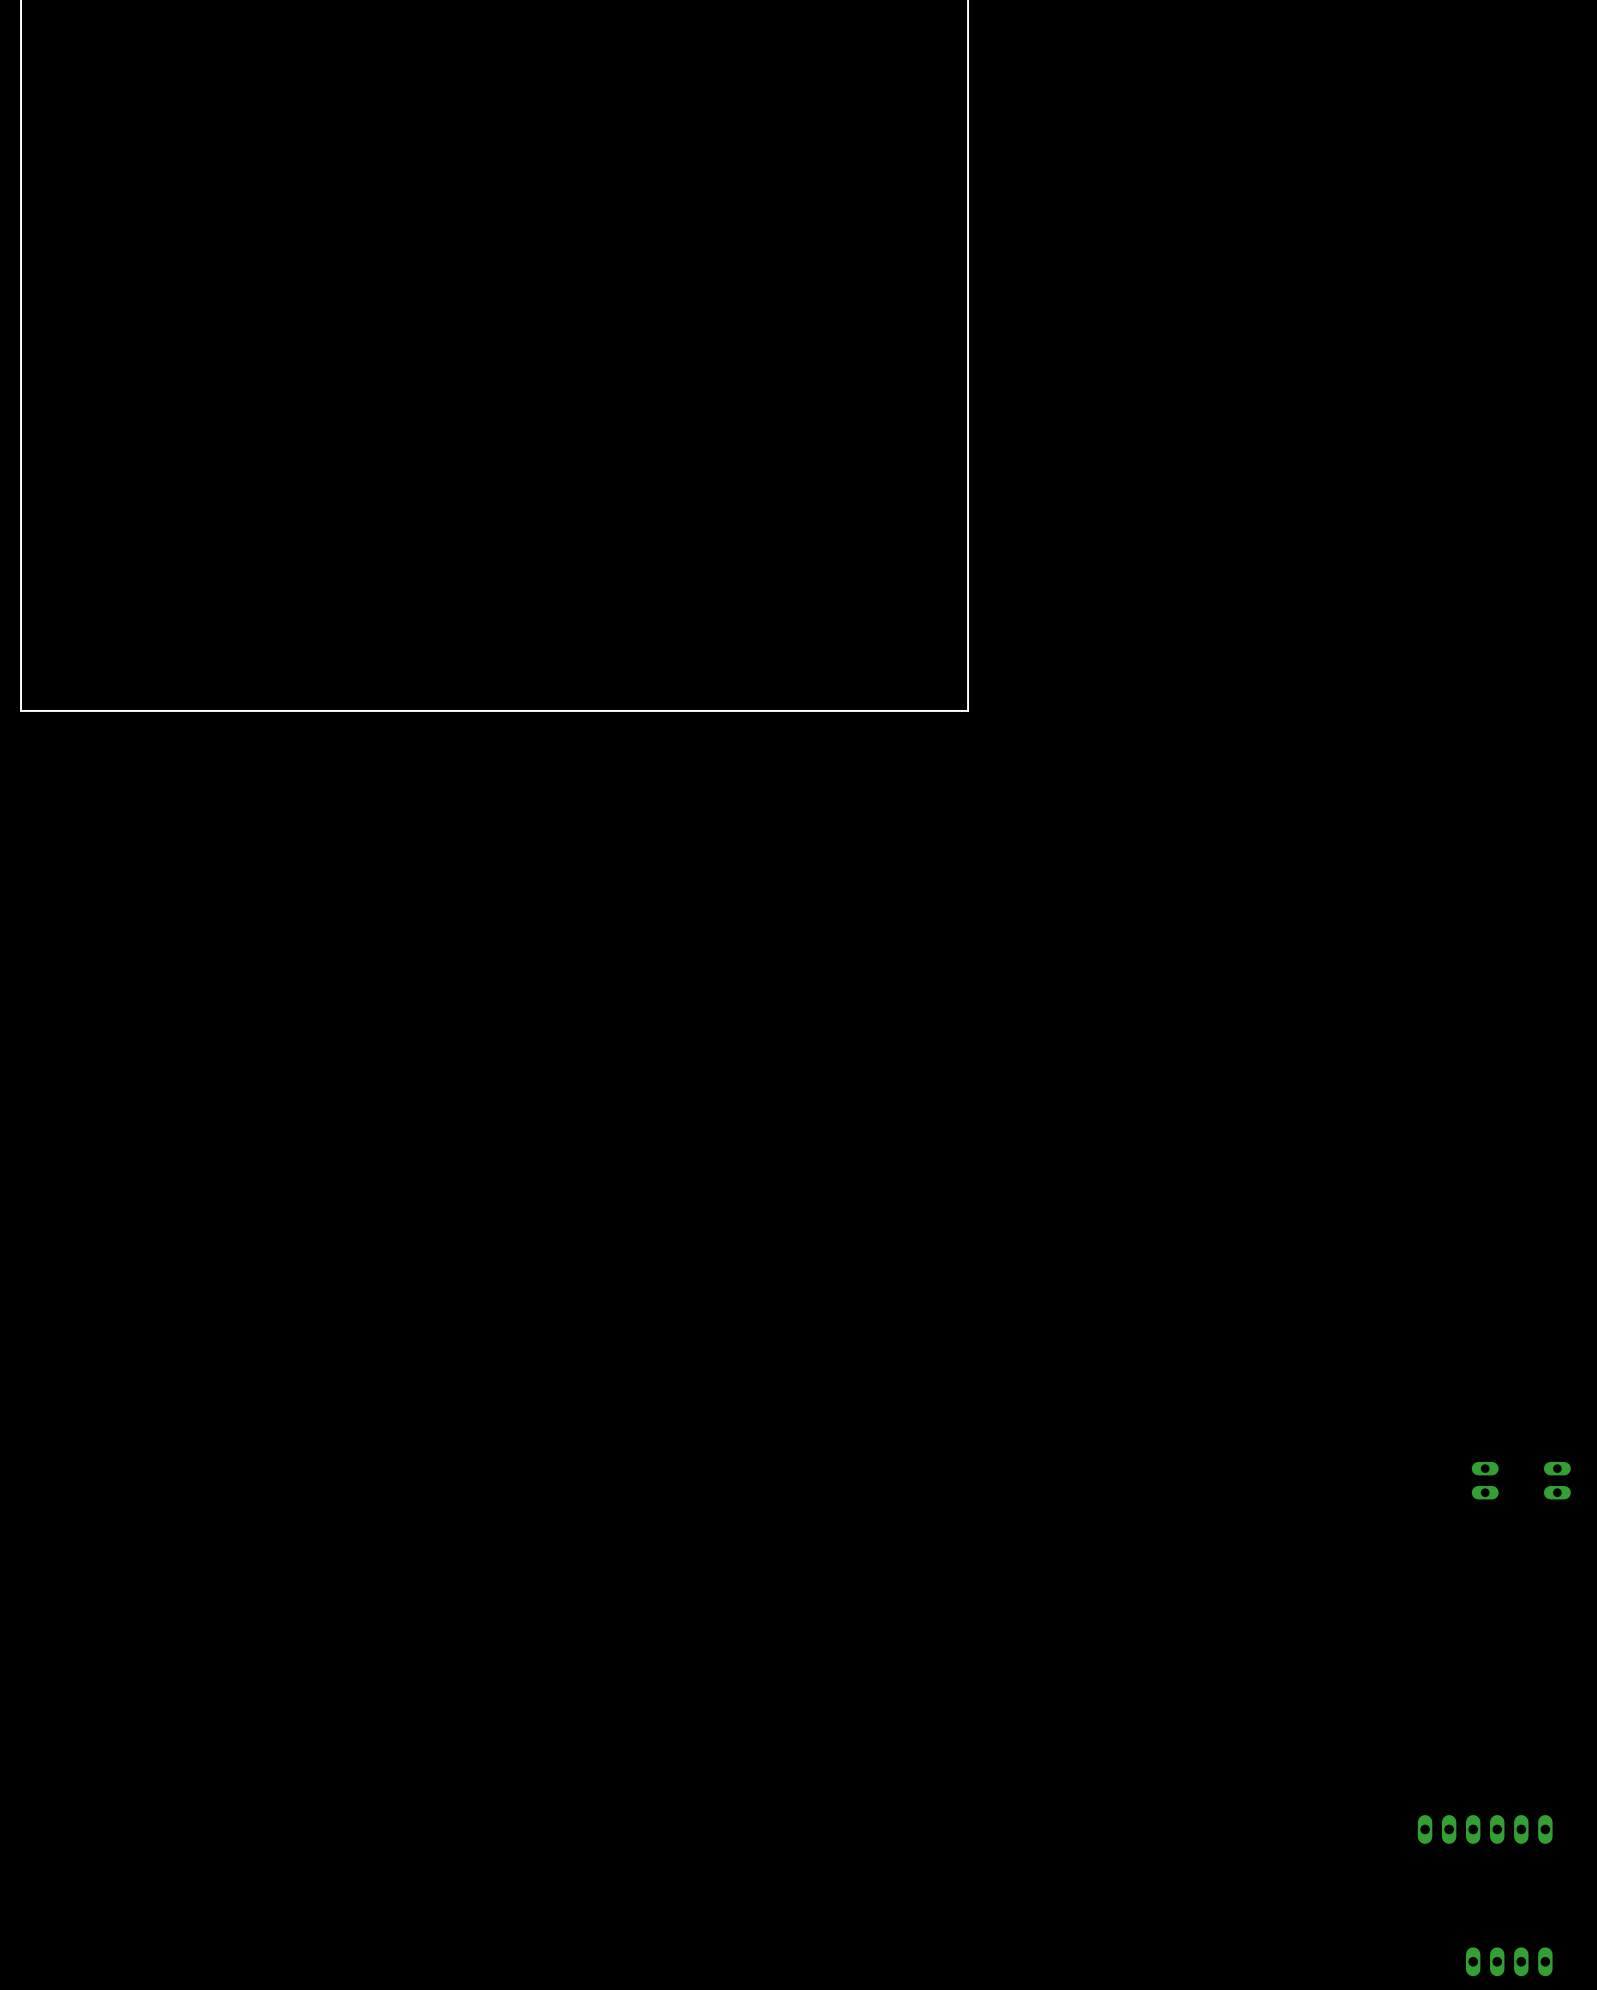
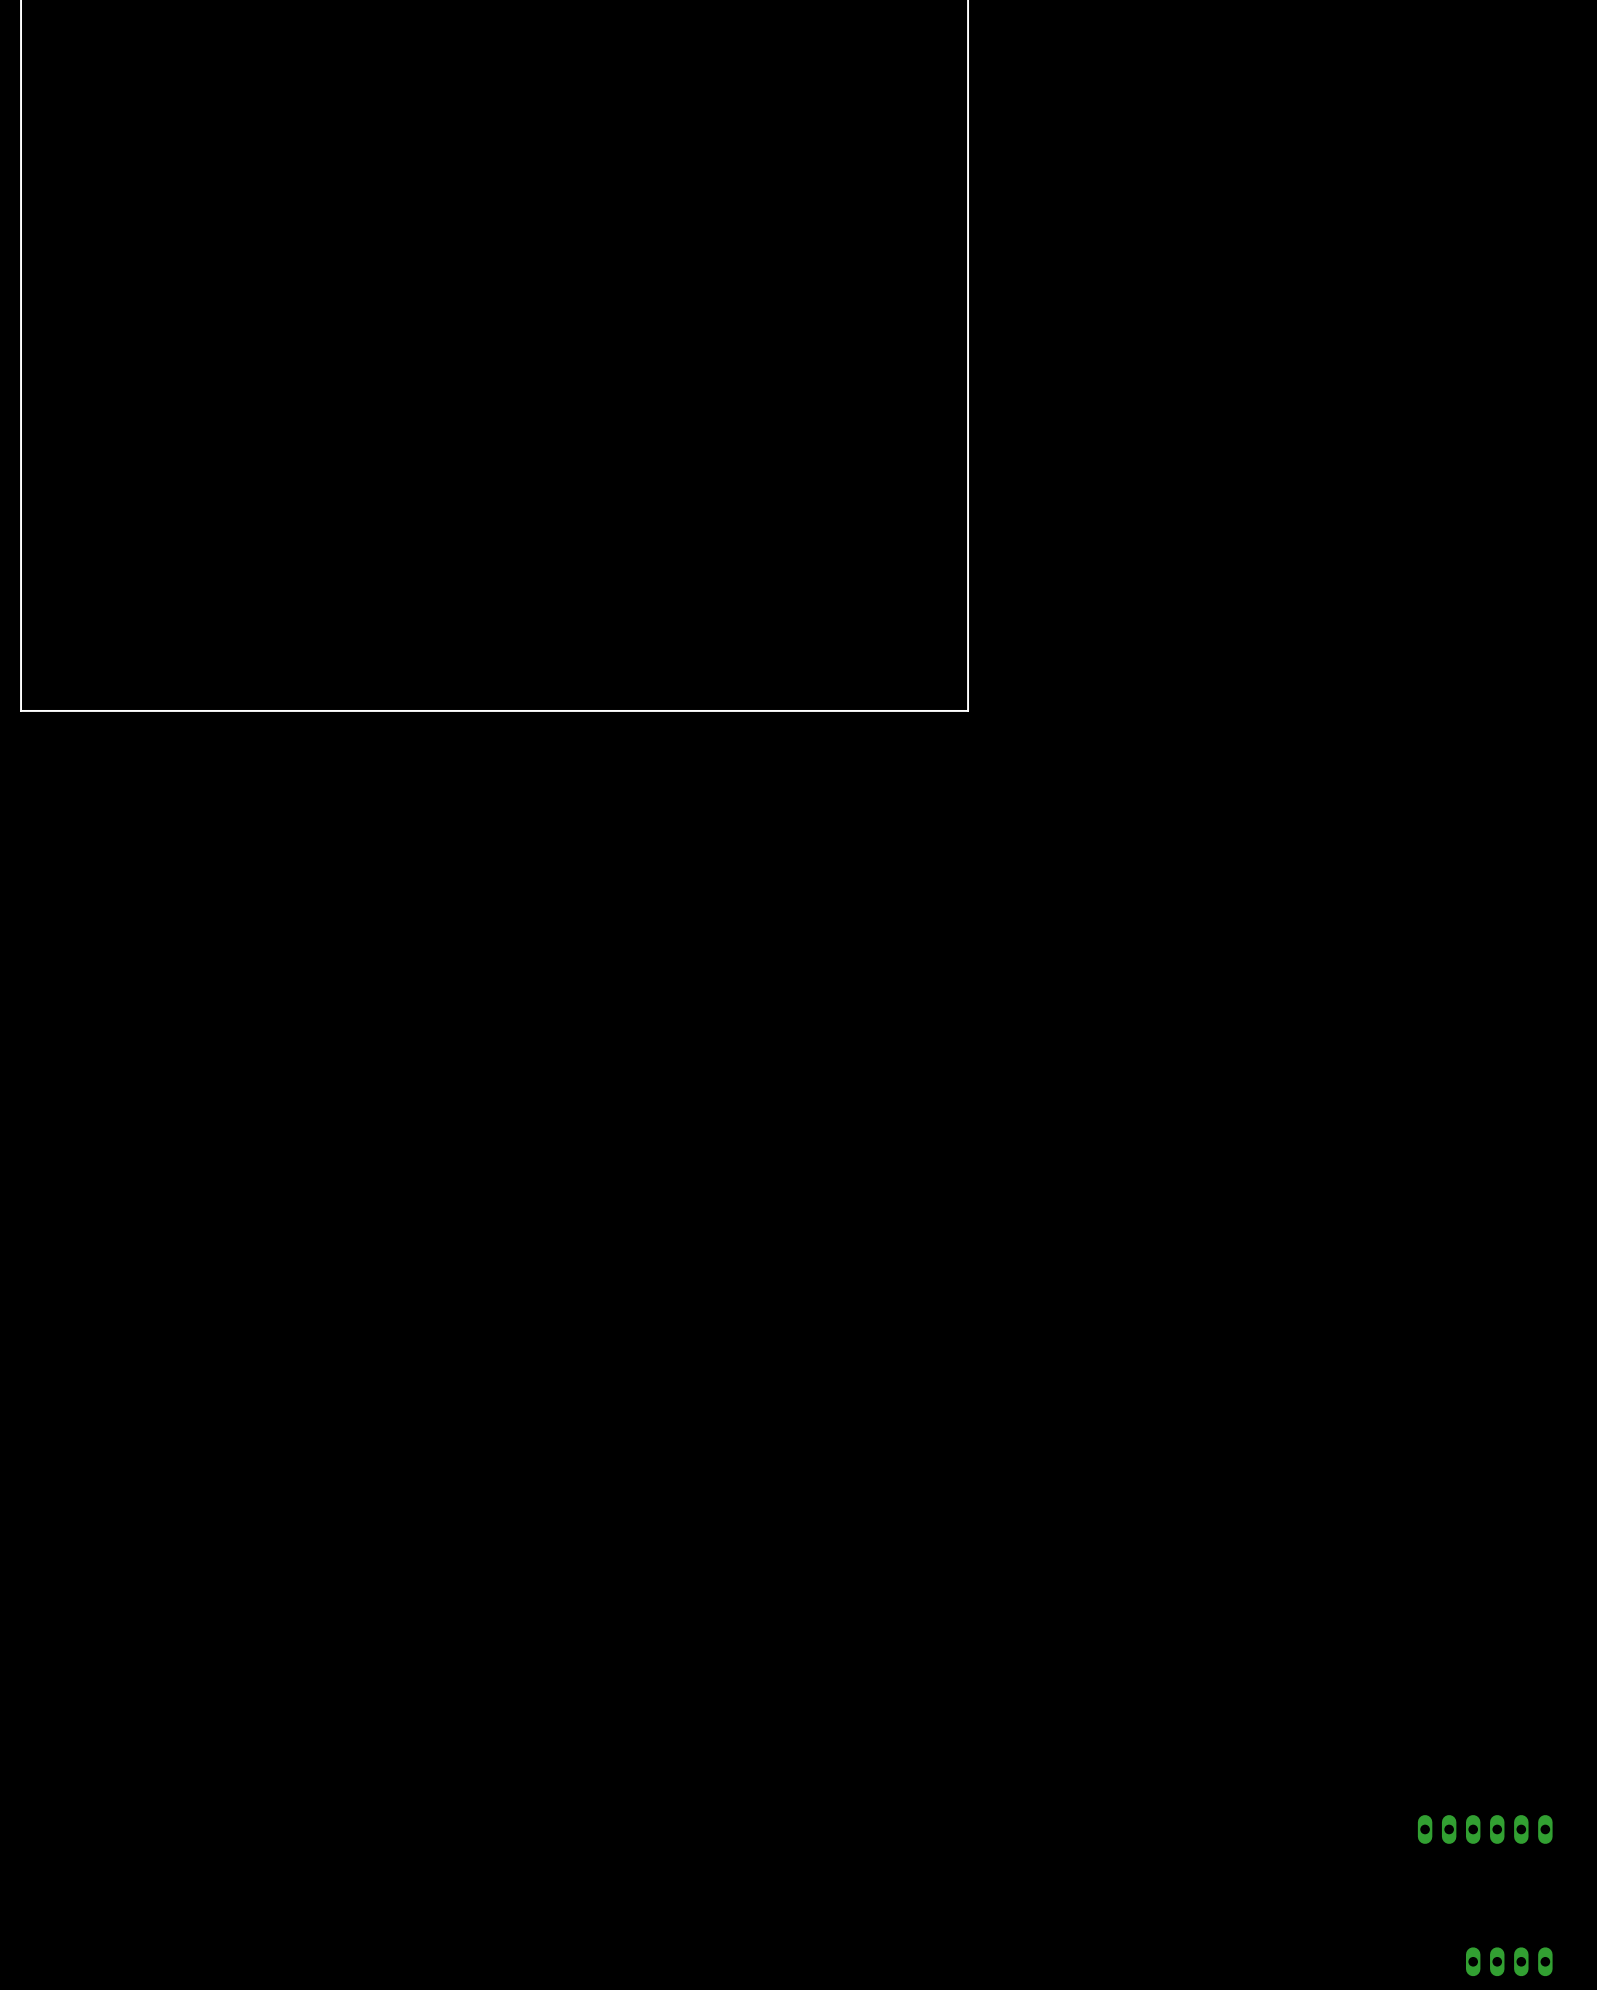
part: (1485, 1480) -> none
part: (1557, 1480) -> none

